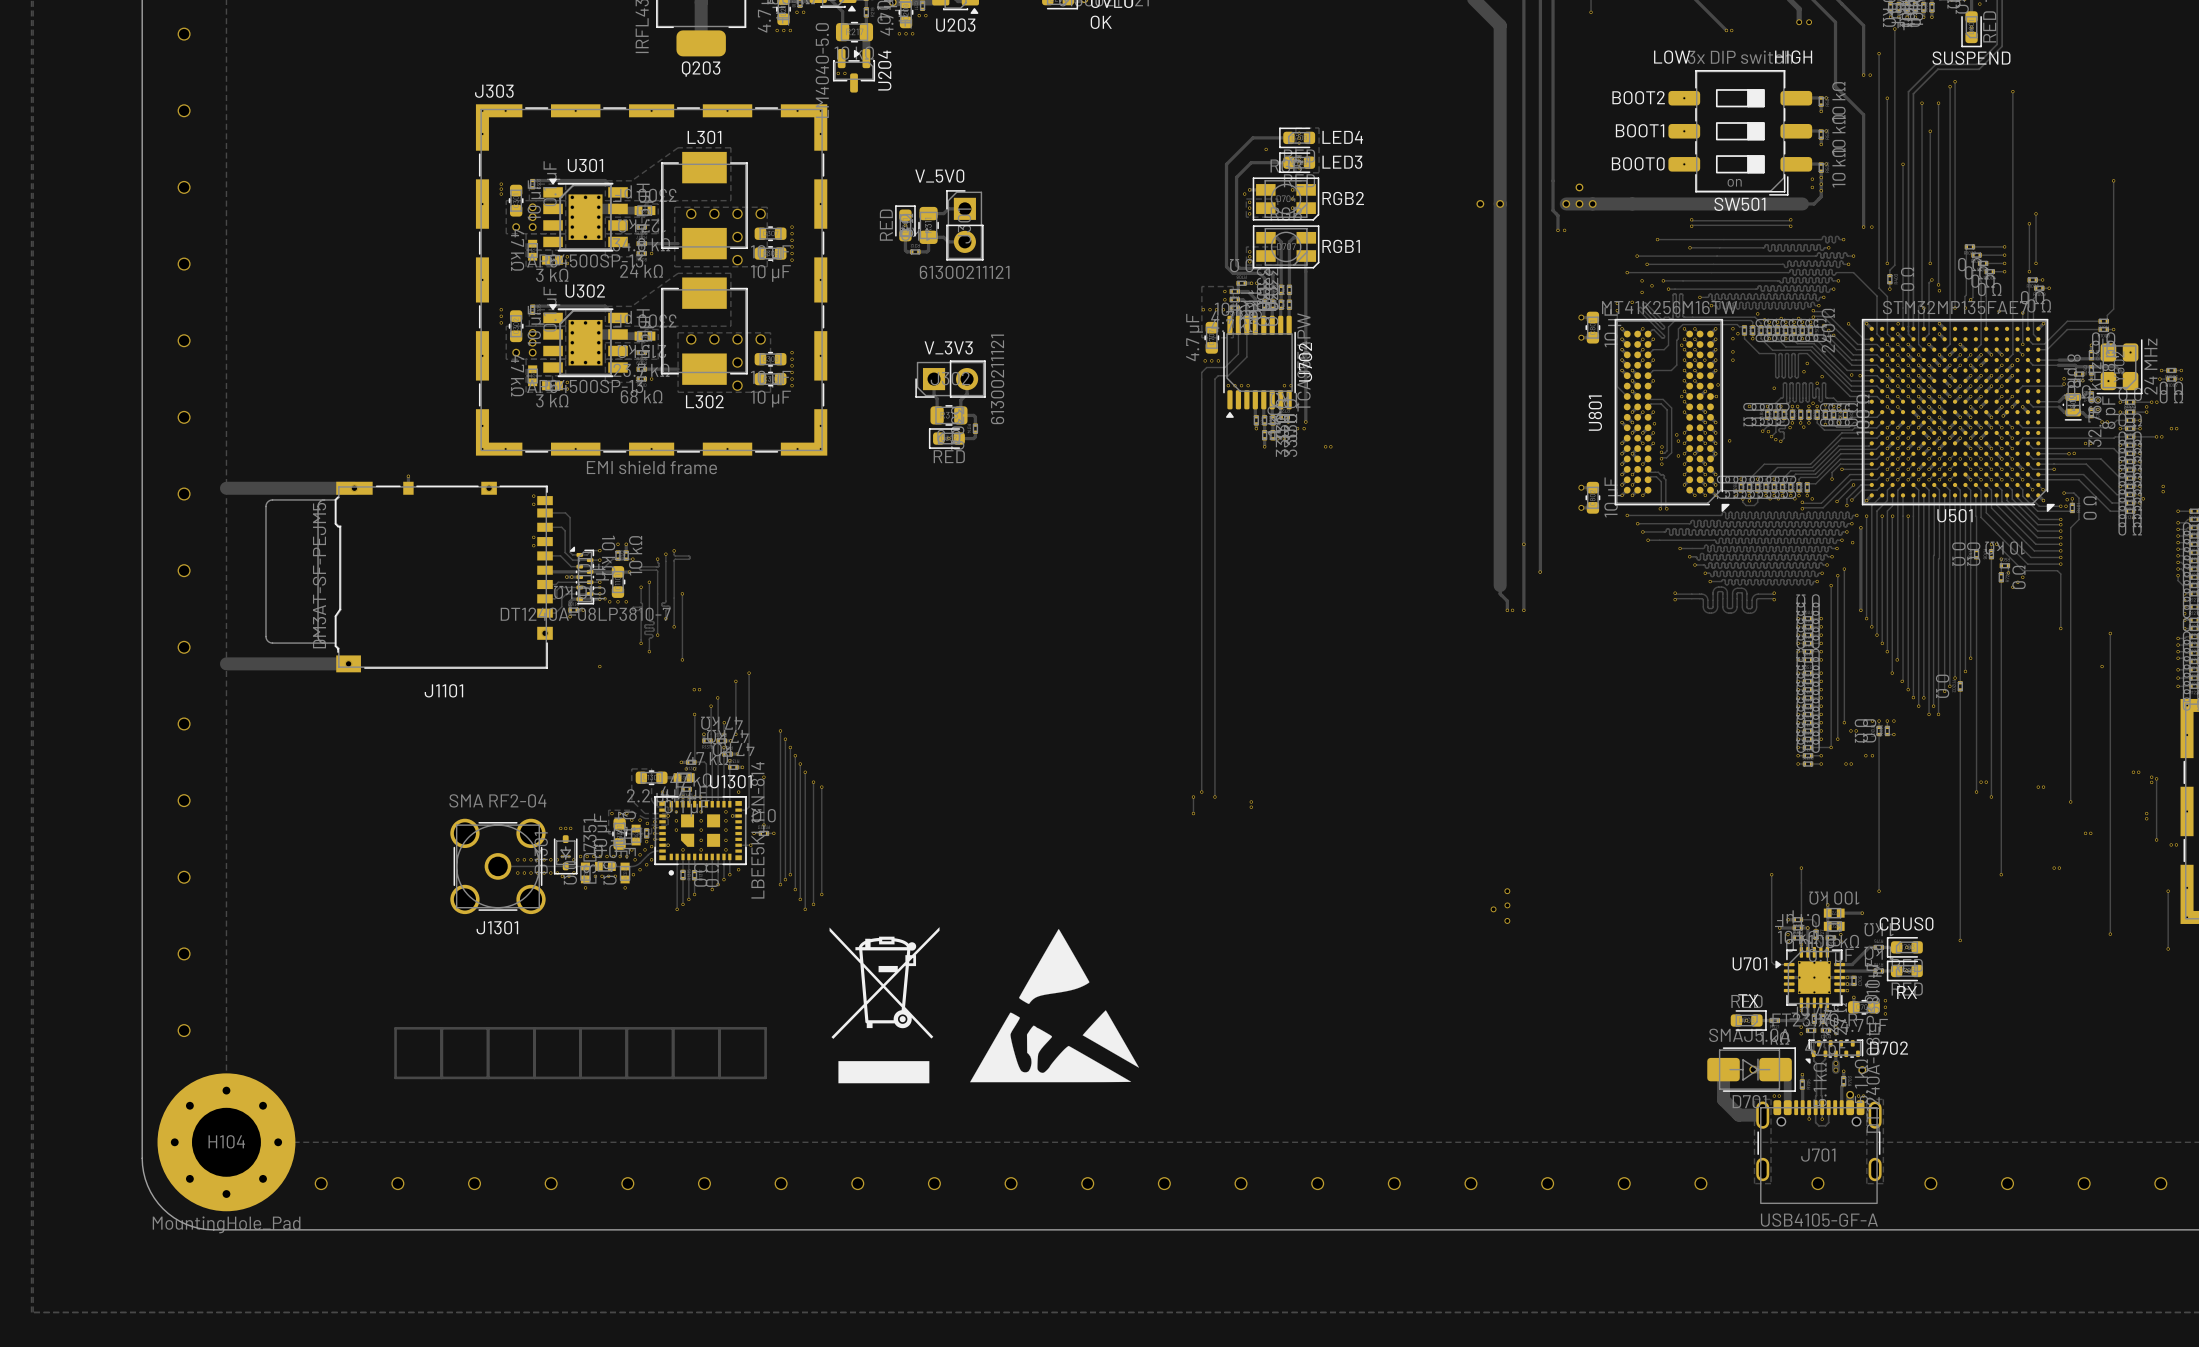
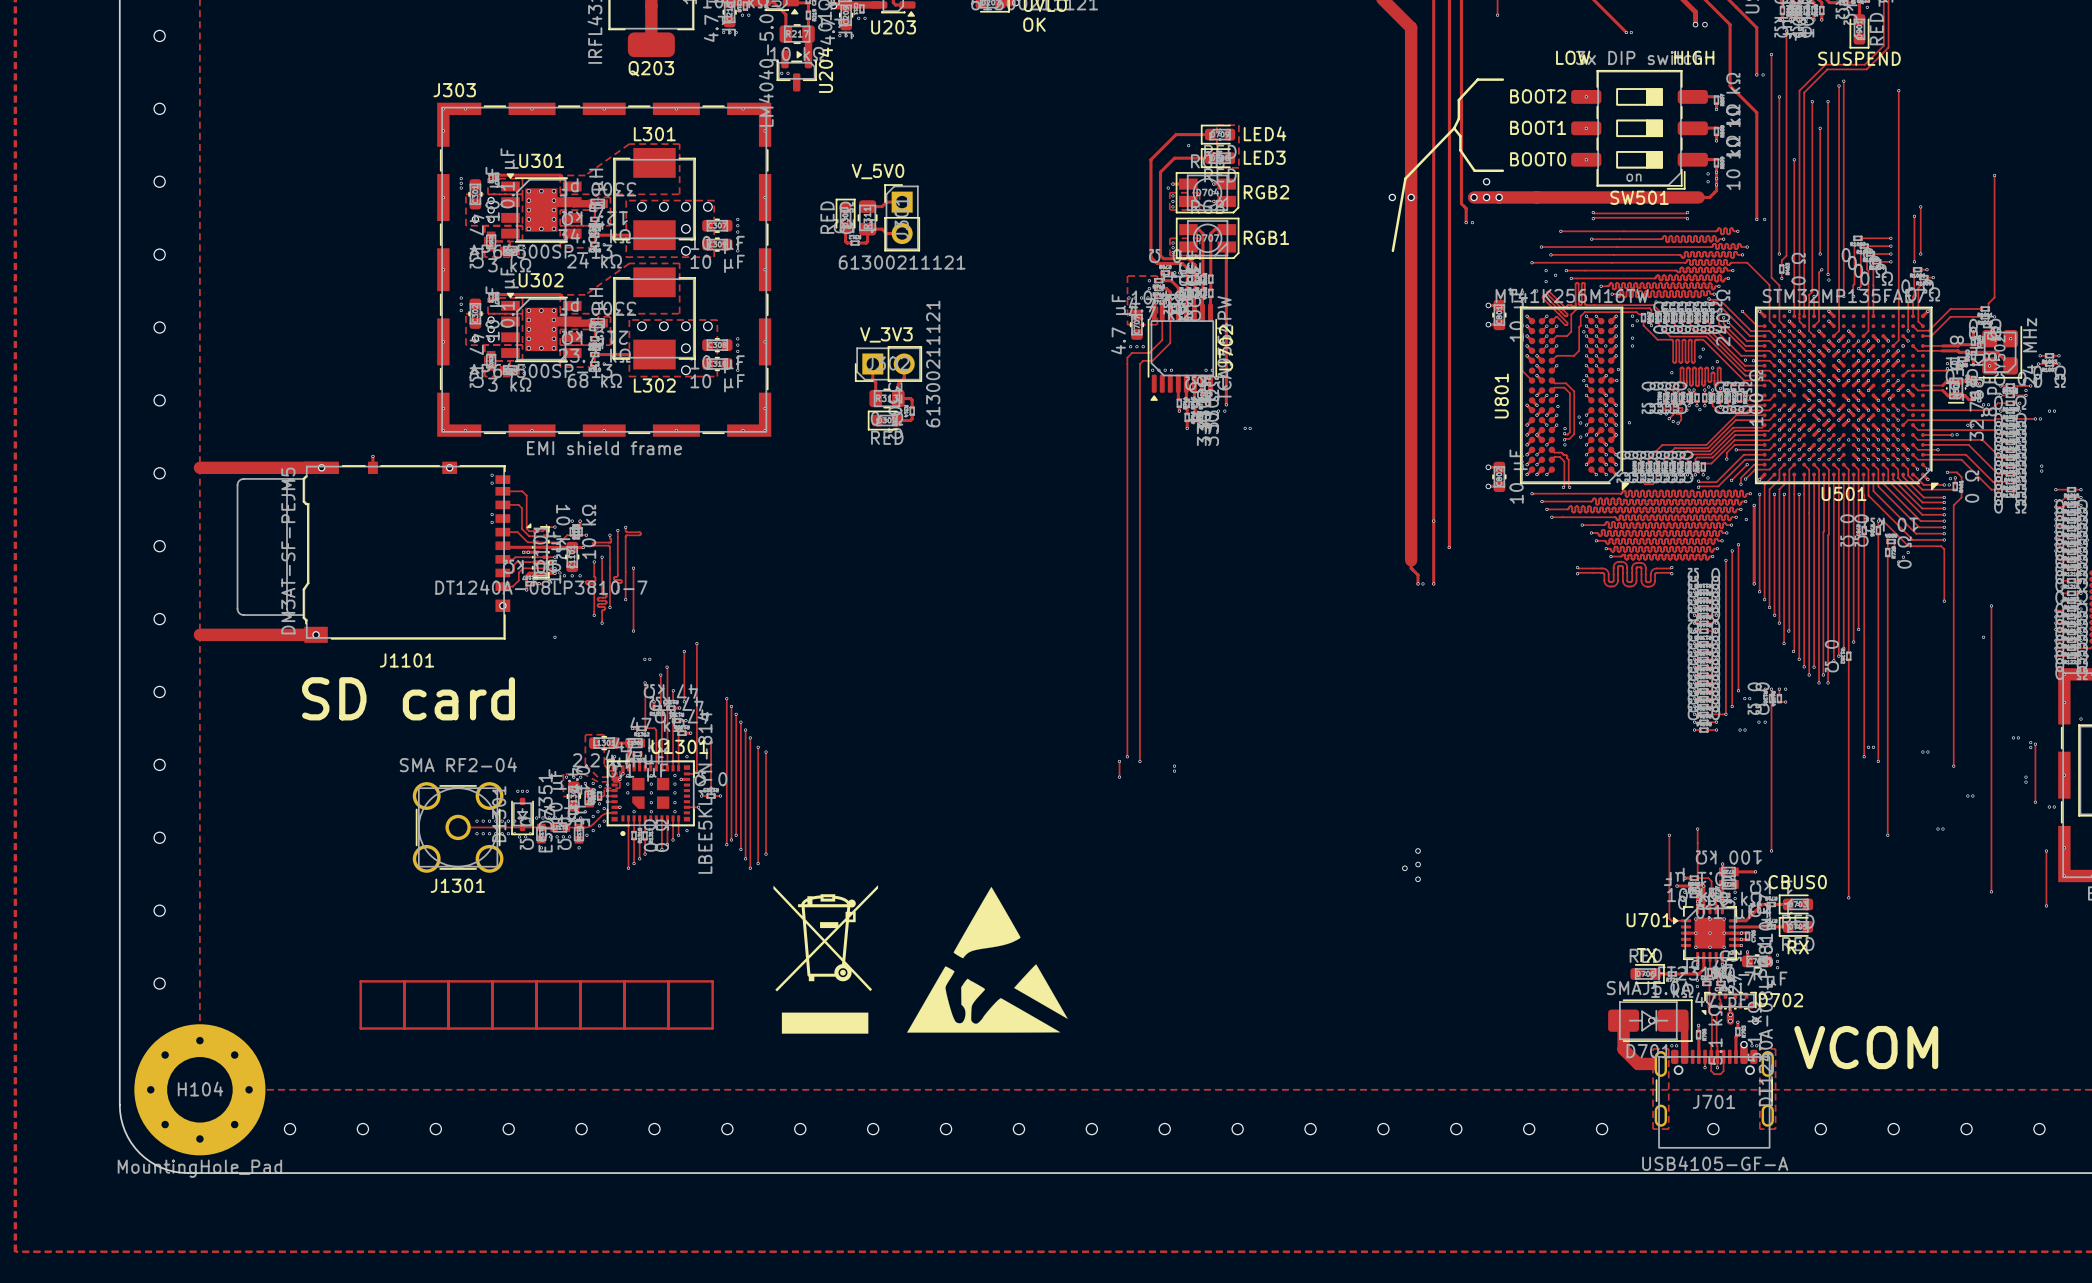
line: none -> (1502, 79) (1477, 79) (1458, 100) (1458, 118) (1454, 128)
line: none -> (1454, 128) (1405, 178) (1392, 250)
line: none -> (1454, 128) (1460, 136) (1460, 150) (1474, 170) (1502, 170)
text: none -> SD card (408, 698)
text: none -> VCOM (1866, 1047)

